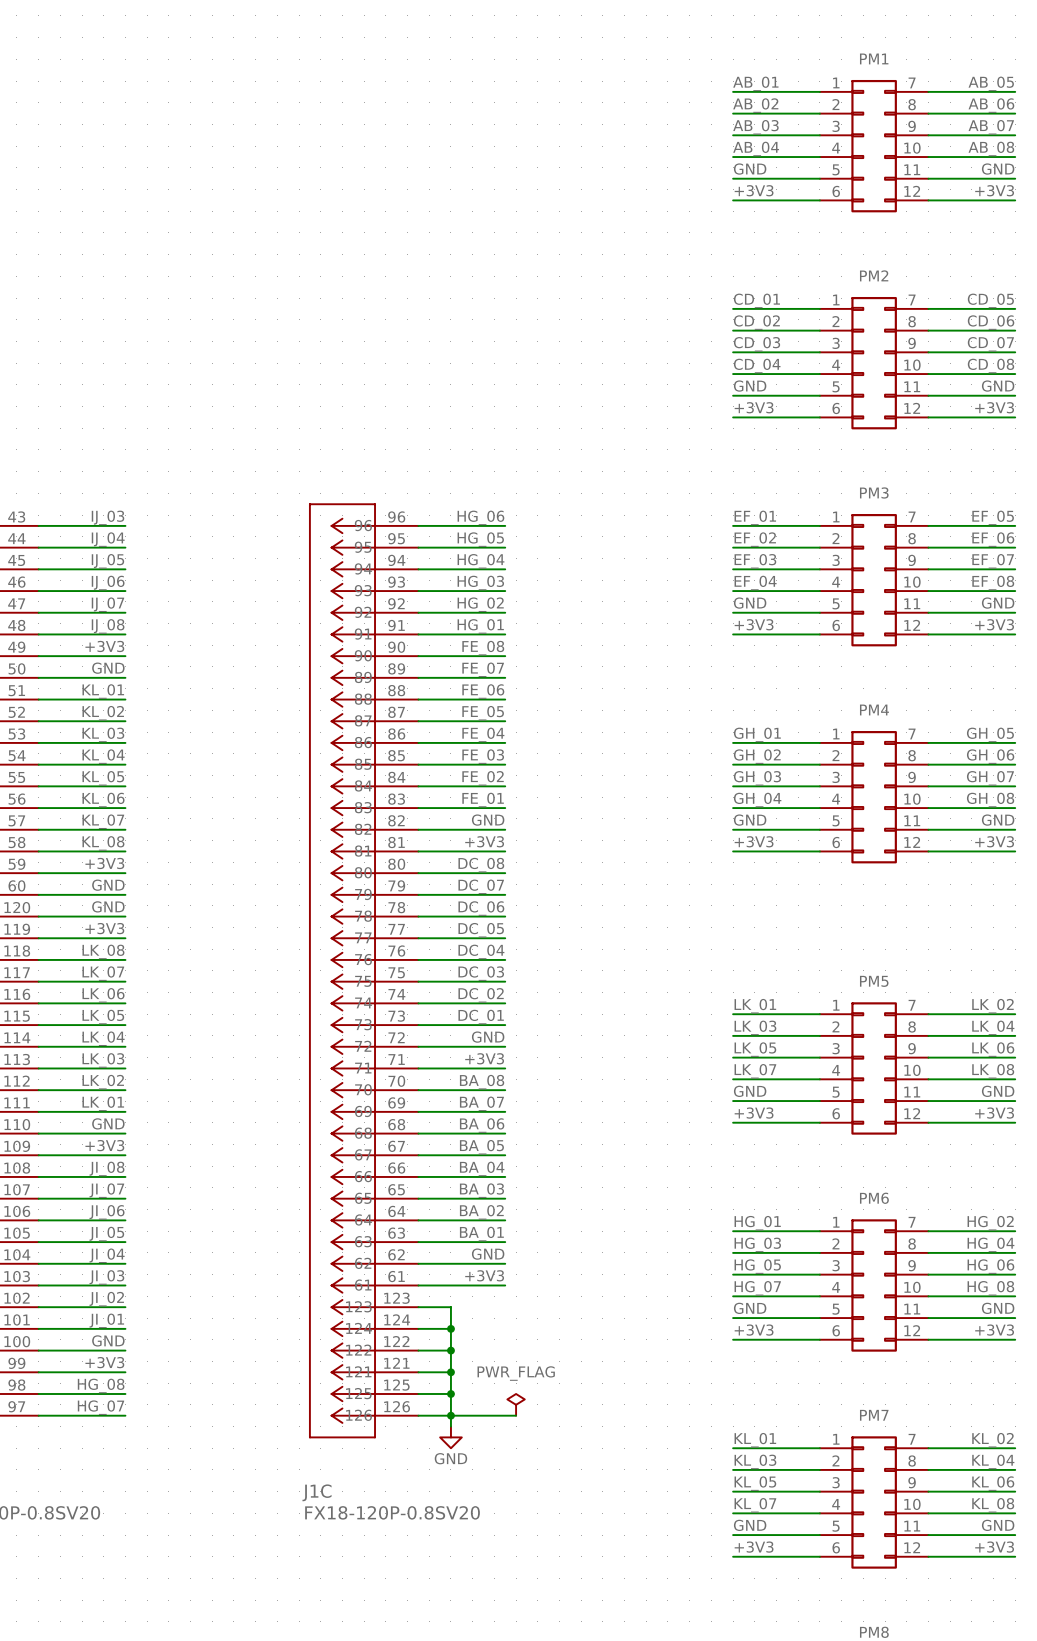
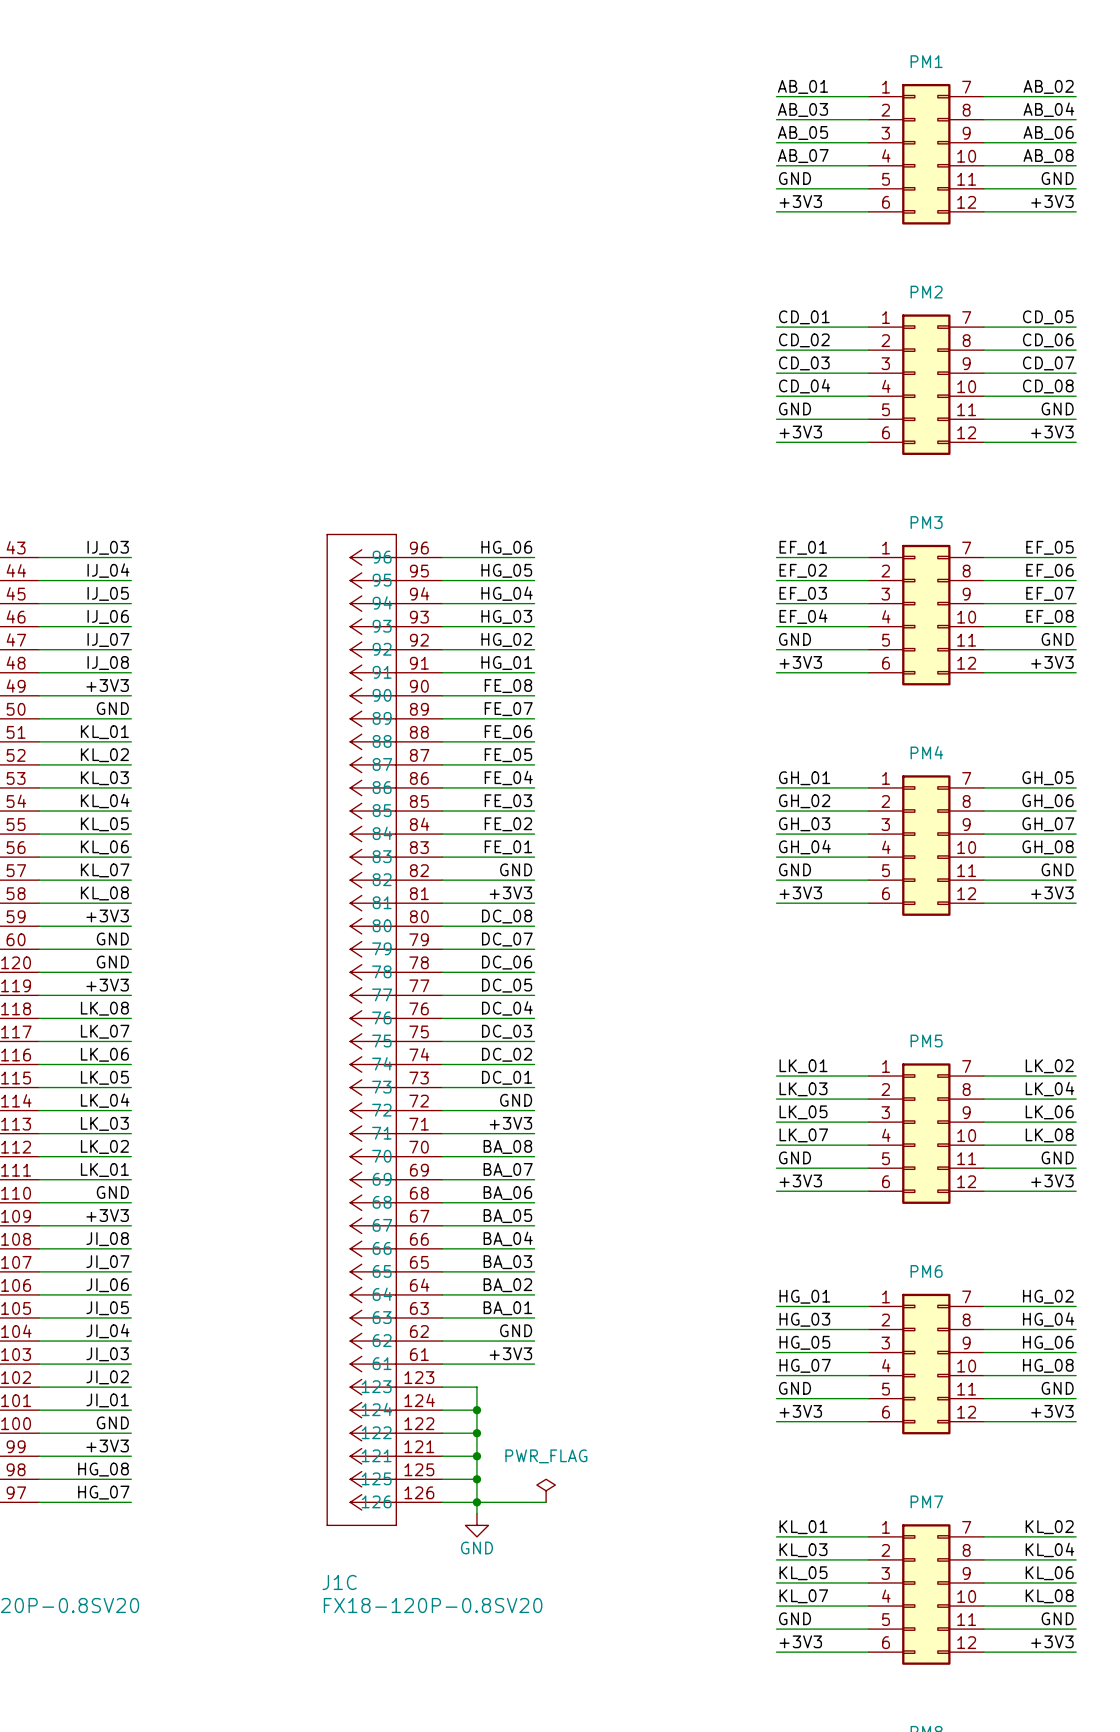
label: AB_05 (991, 83) -> AB_02 (1048, 86)
label: AB_02 (755, 105) -> AB_03 (802, 109)
label: AB_06 (991, 105) -> AB_04 (1048, 109)
label: AB_03 (755, 127) -> AB_05 (802, 133)
label: AB_07 (991, 127) -> AB_06 (1048, 133)
label: AB_04 (756, 148) -> AB_07 (803, 156)

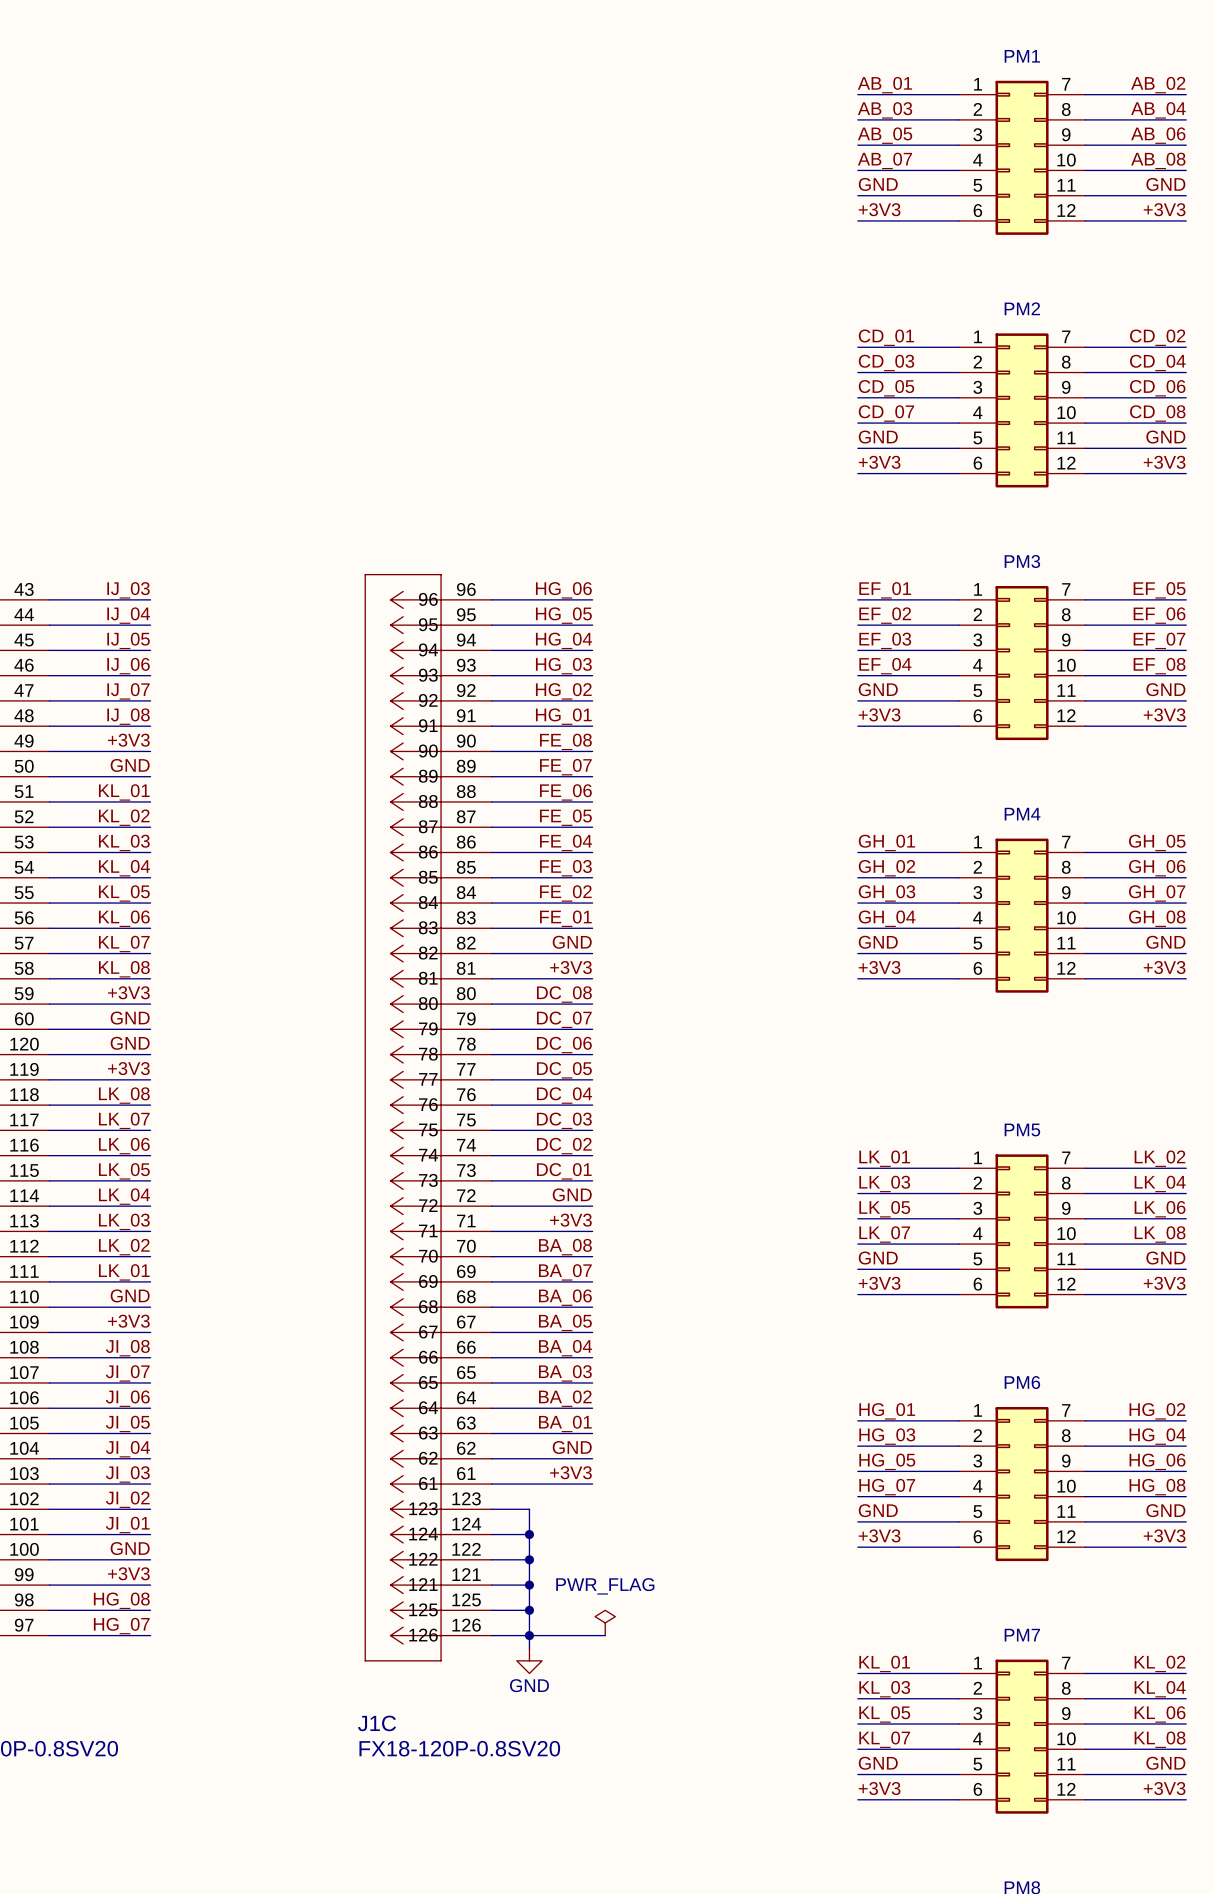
label: CD_05 (1048, 317) -> CD_02 (1157, 337)
label: CD_02 (804, 340) -> CD_03 (886, 362)
label: CD_06 (1048, 340) -> CD_04 (1157, 362)
label: CD_03 (804, 363) -> CD_05 (886, 388)
label: CD_07 (1048, 363) -> CD_06 (1157, 388)
label: CD_04 (804, 386) -> CD_07 (886, 413)

